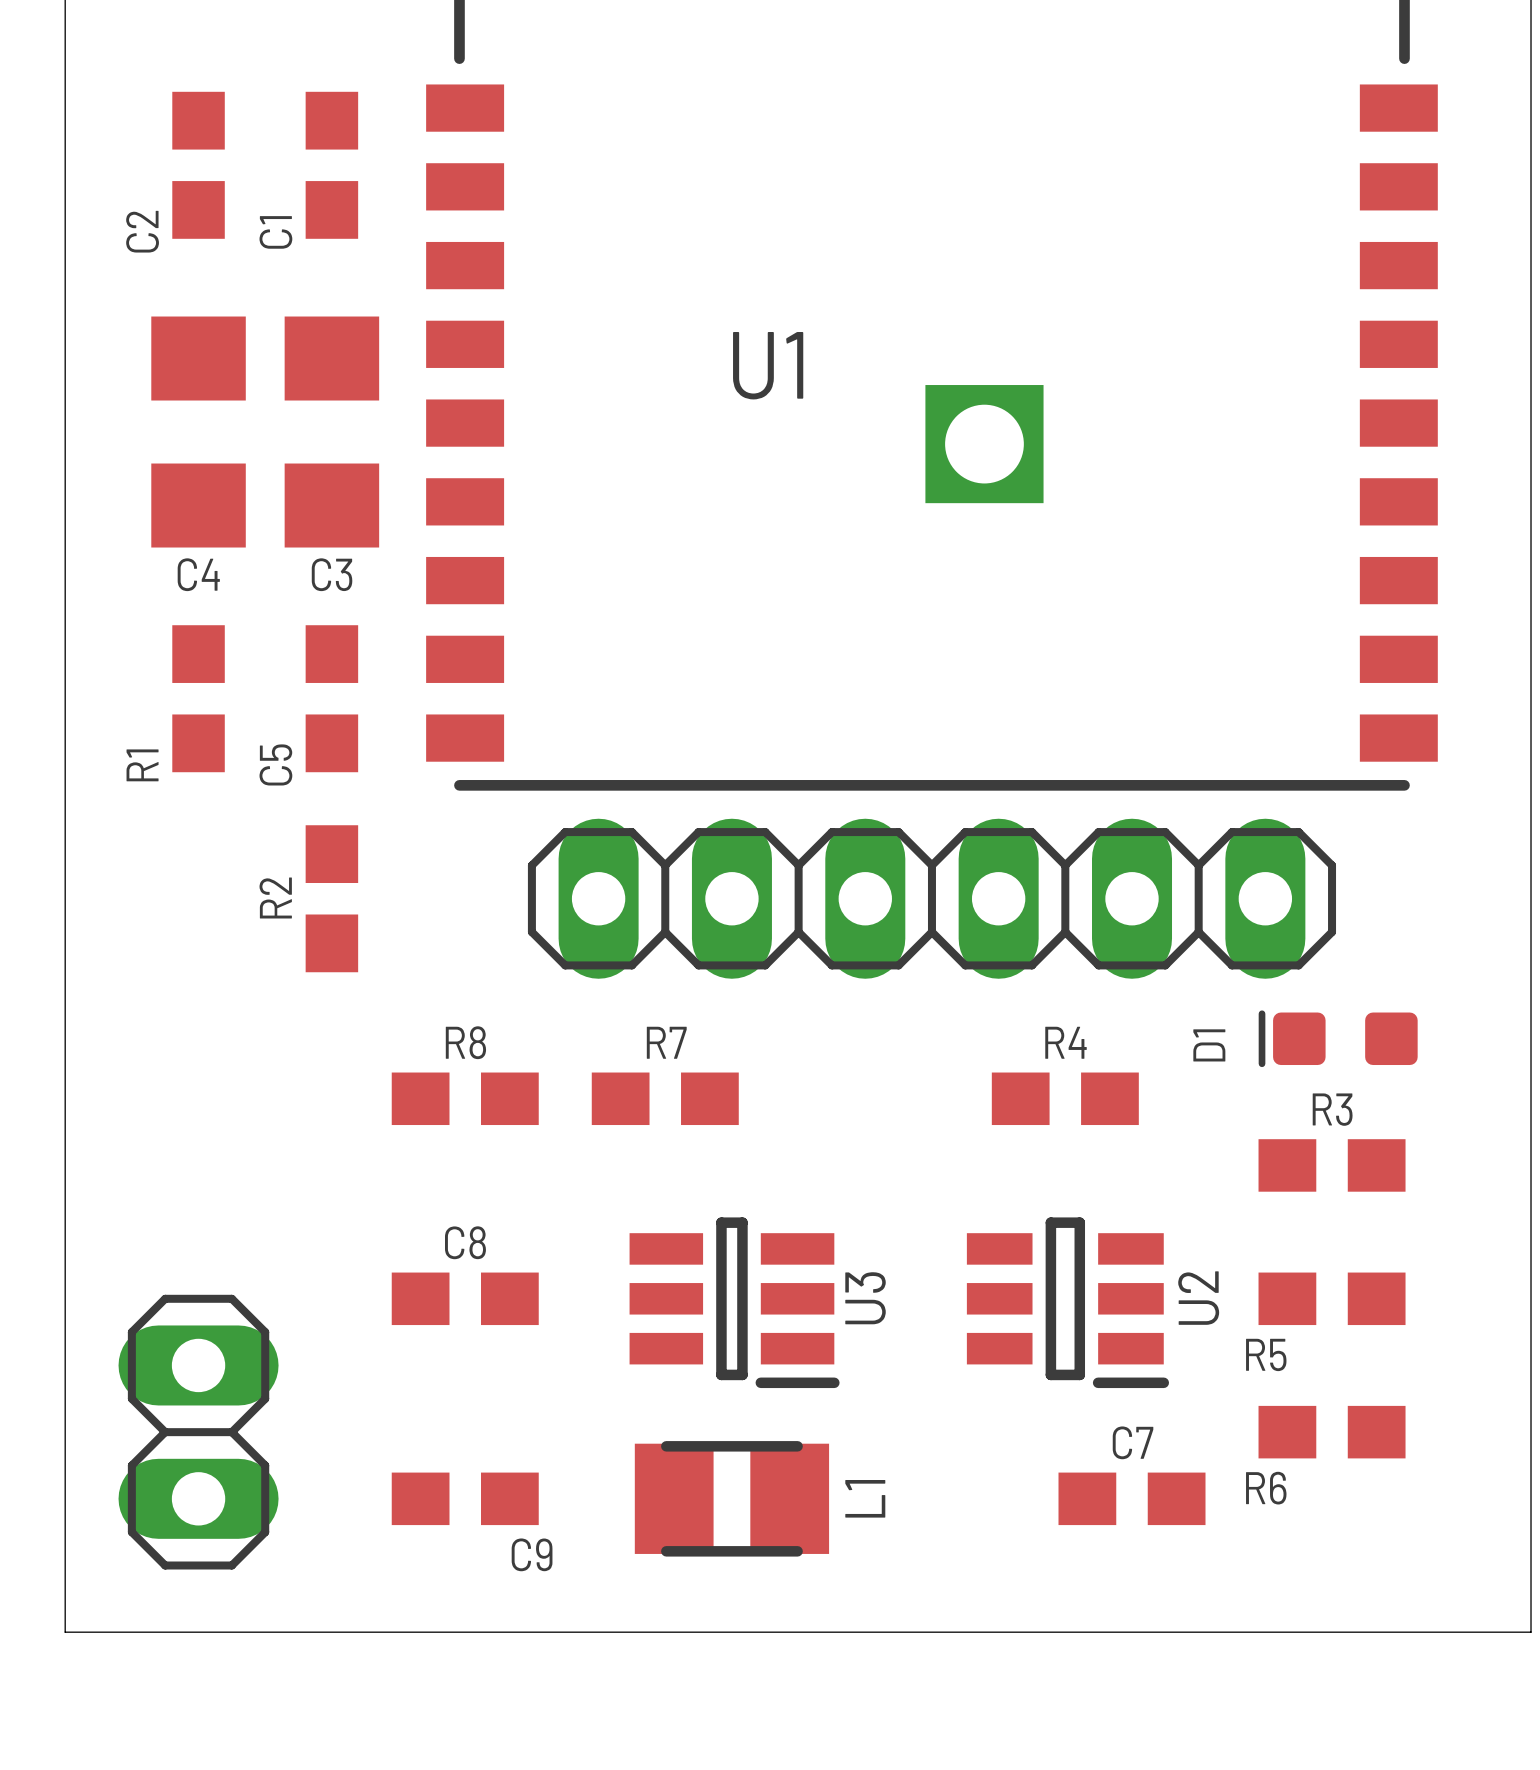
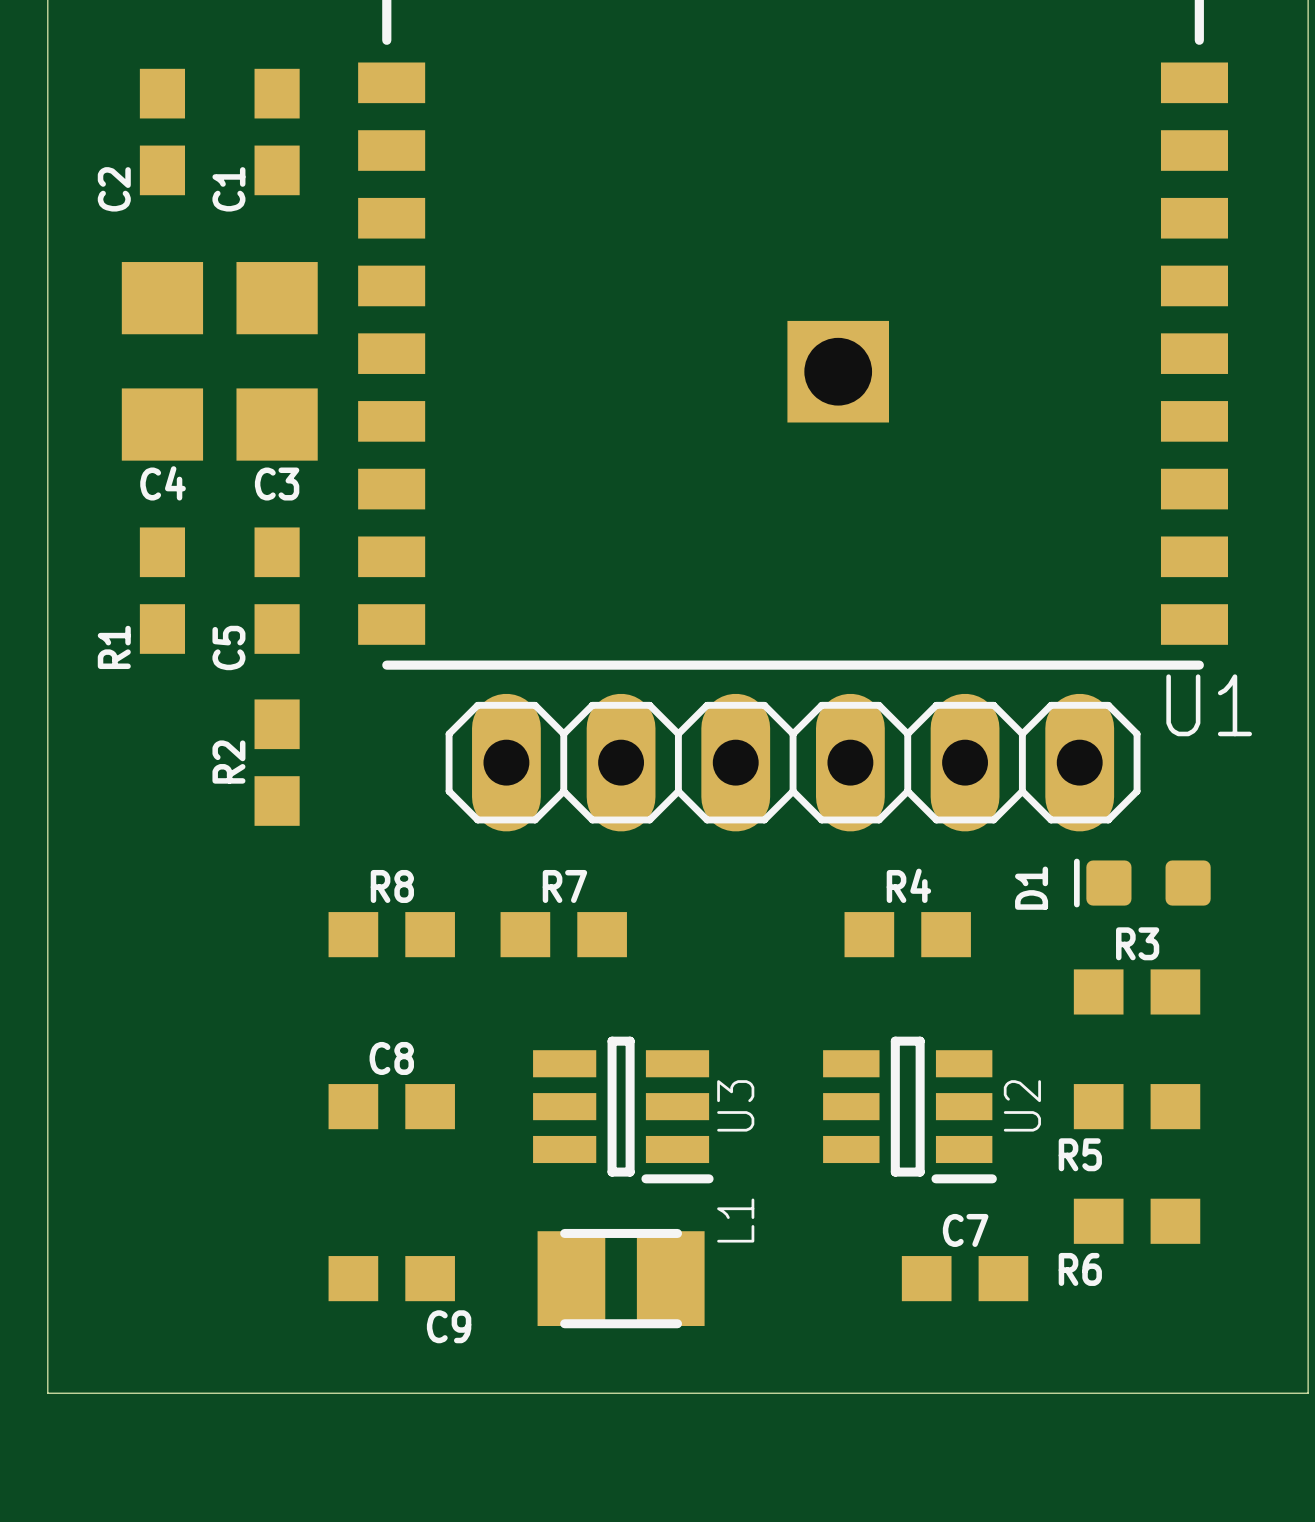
U1 name position: U1 (768, 365) -> U1 (1209, 705)
part: (198, 1432) -> none
L1 name position: L1 (865, 1498) -> L1 (735, 1220)

